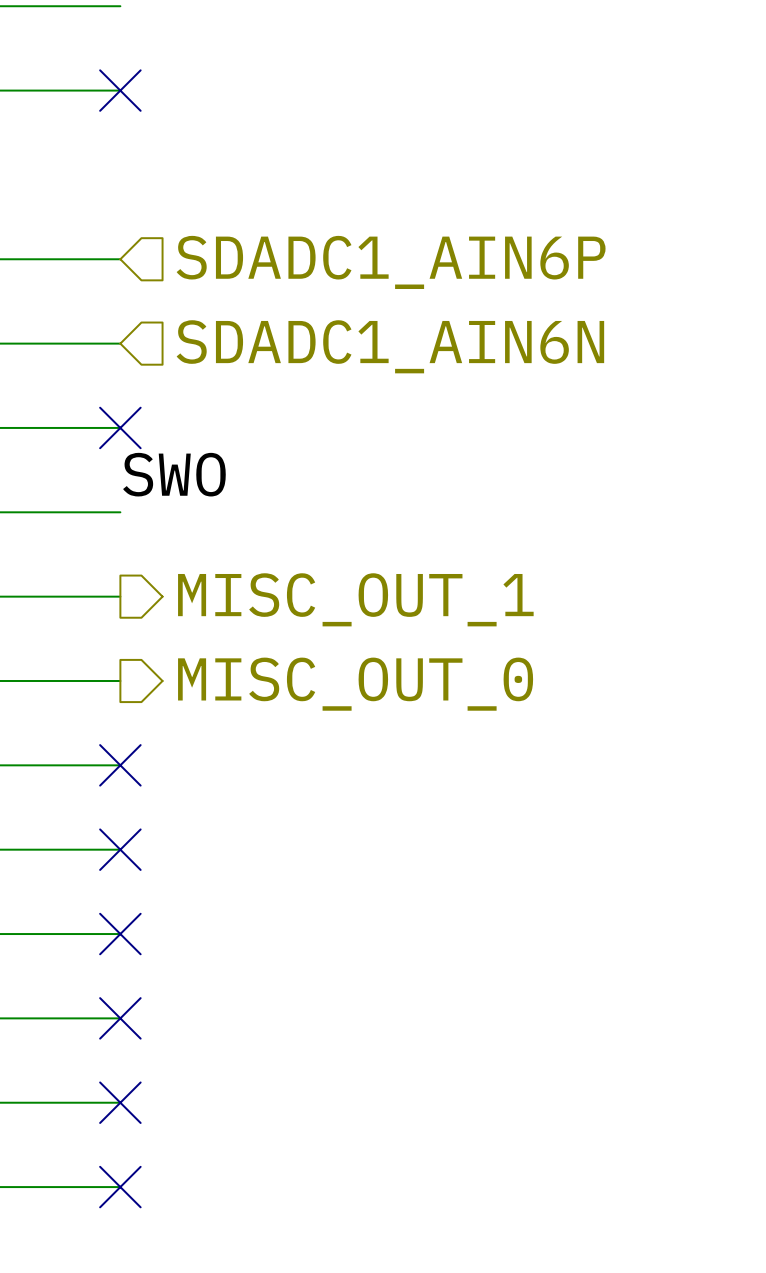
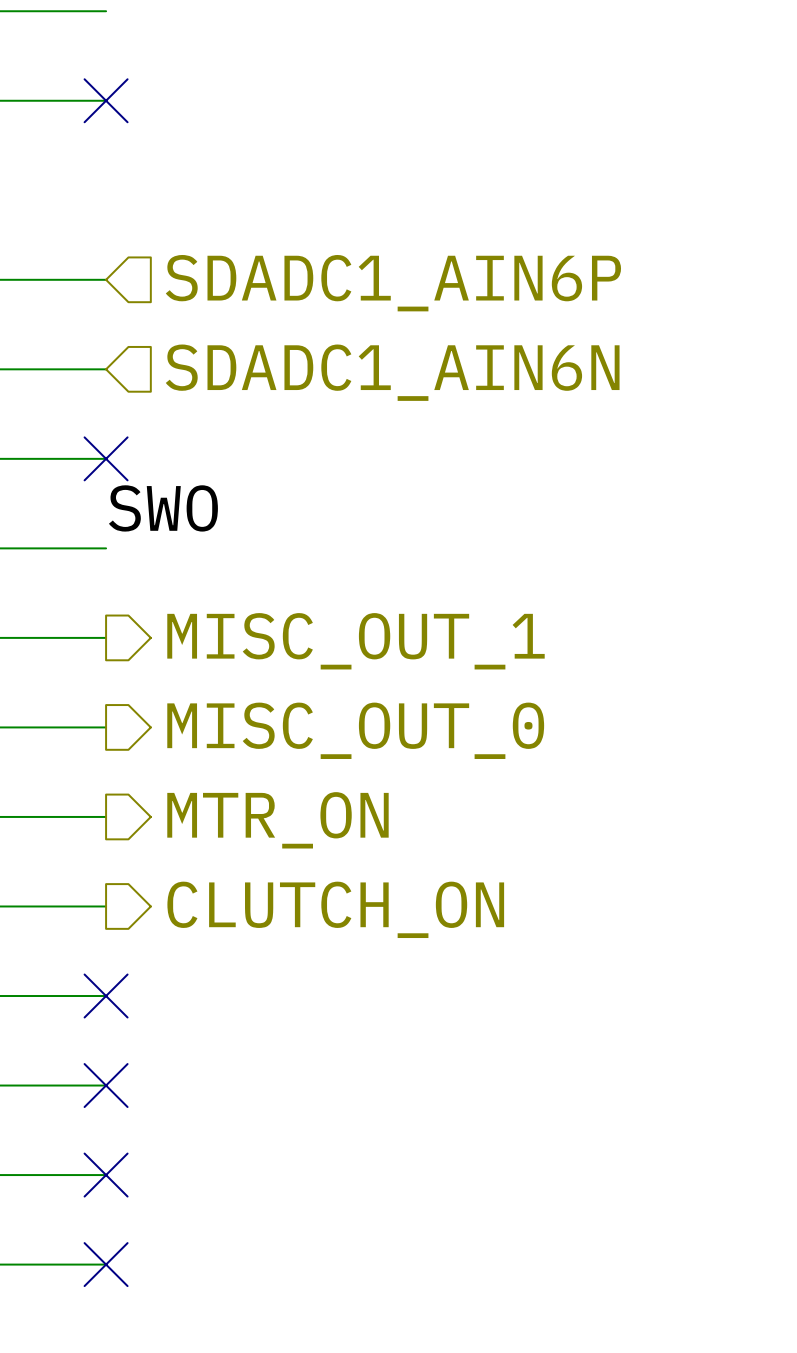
no-connect mark: (120, 765) -> none
hierarchical label: none -> MTR_ON (277, 820)
no-connect mark: (120, 849) -> none
hierarchical label: none -> CLUTCH_ON (335, 909)

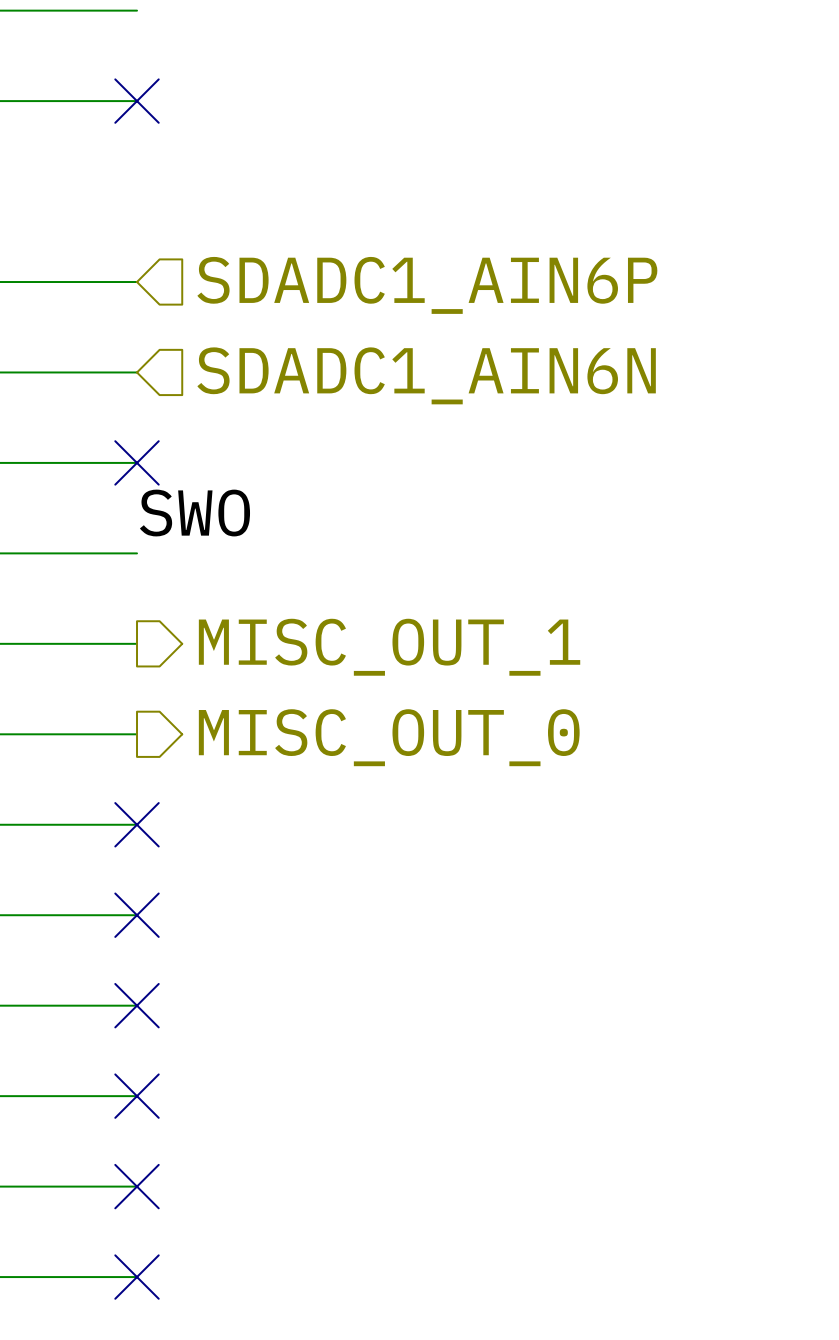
no-connect mark: none -> (137, 824)
hierarchical label: MTR_ON (277, 820) -> none
no-connect mark: none -> (137, 915)
hierarchical label: CLUTCH_ON (335, 909) -> none

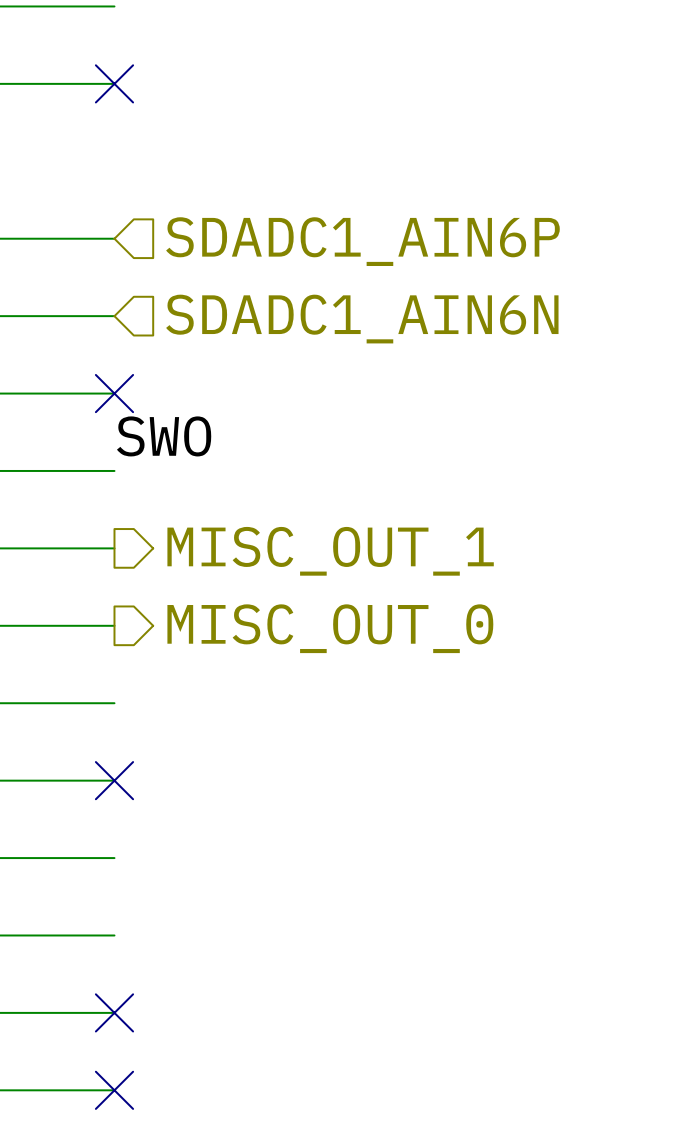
no-connect mark: (137, 824) -> none
no-connect mark: (137, 1005) -> none
no-connect mark: (137, 1096) -> none

